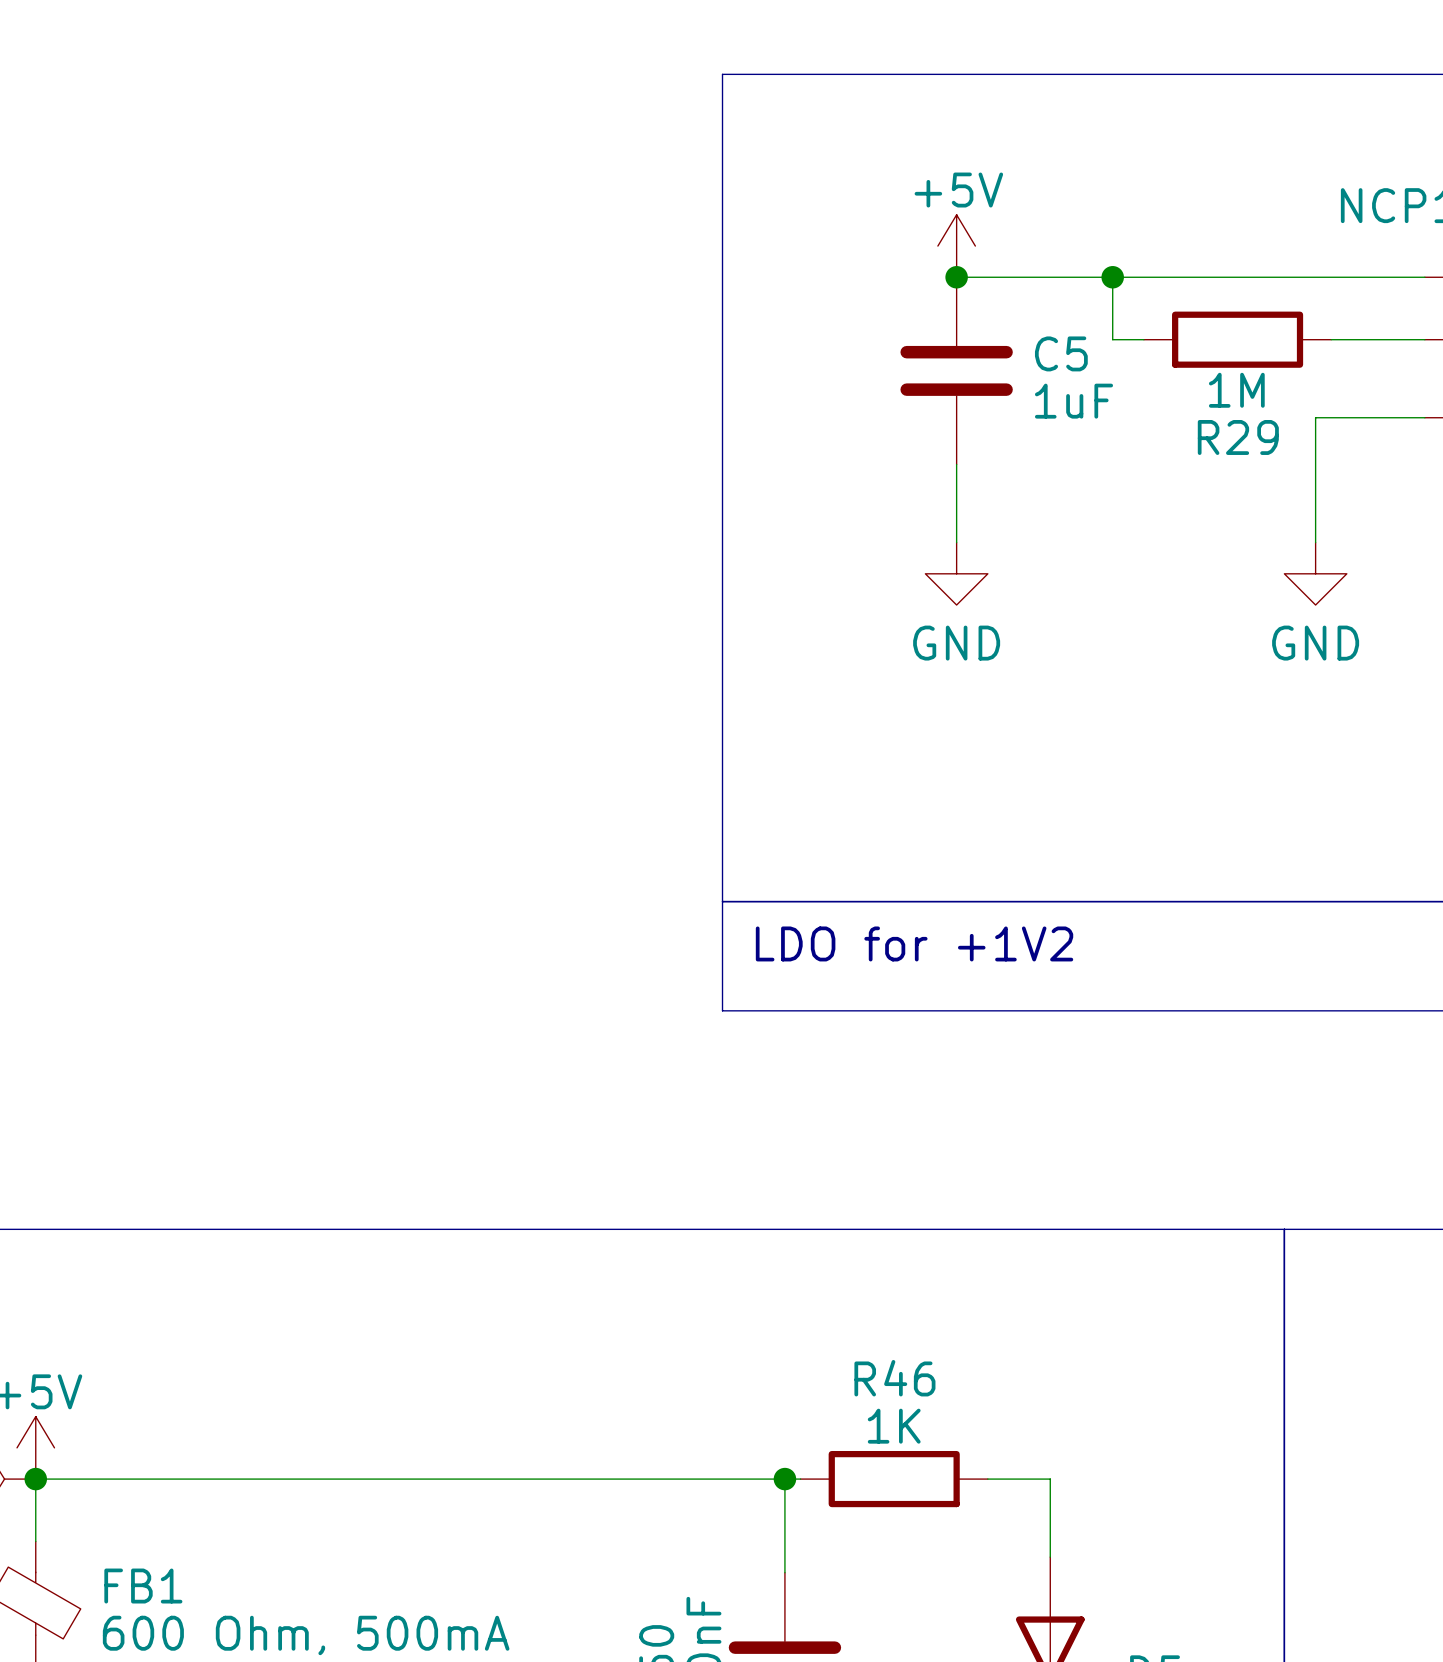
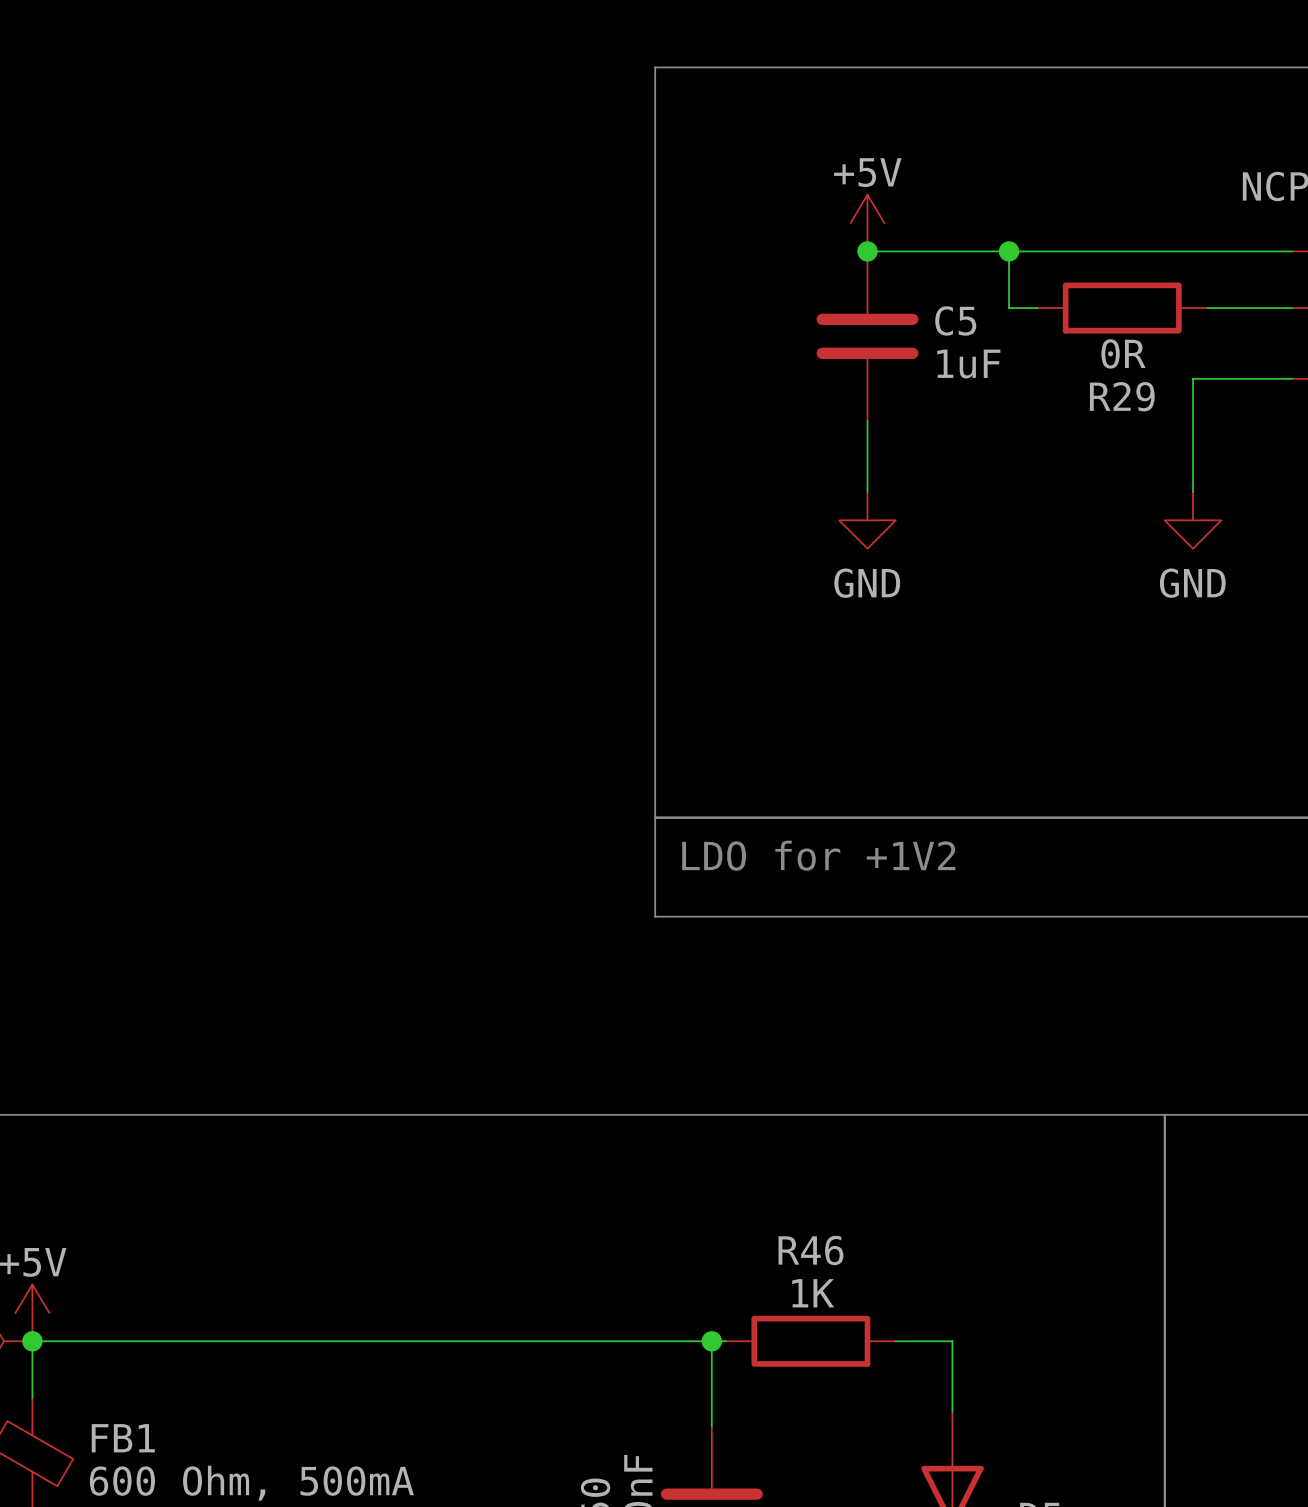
R29 value: 1M (1236, 390) -> 0R (1123, 353)

